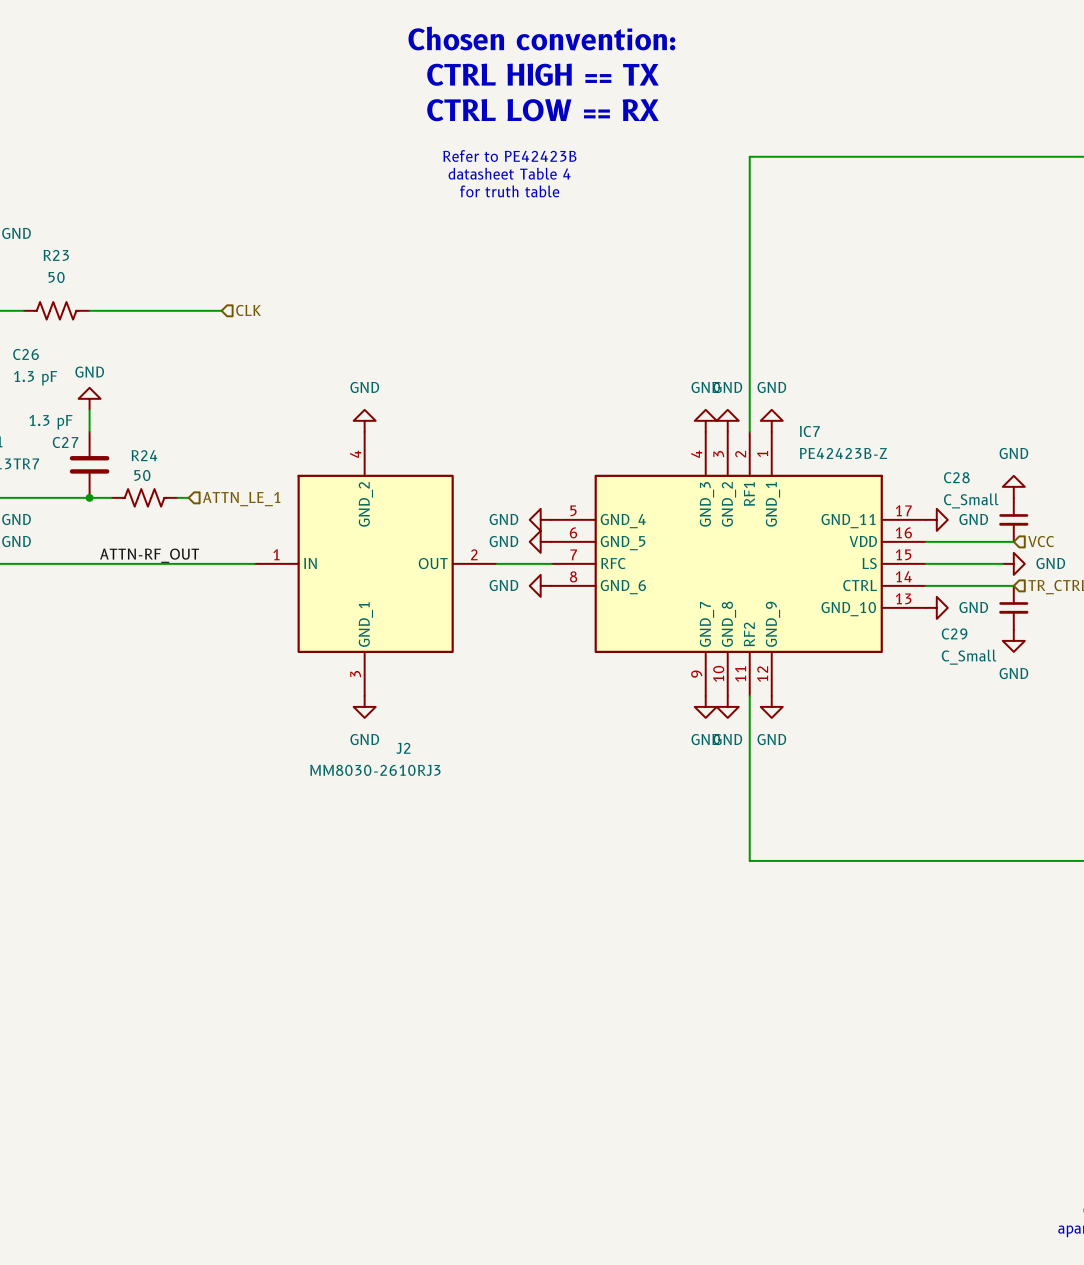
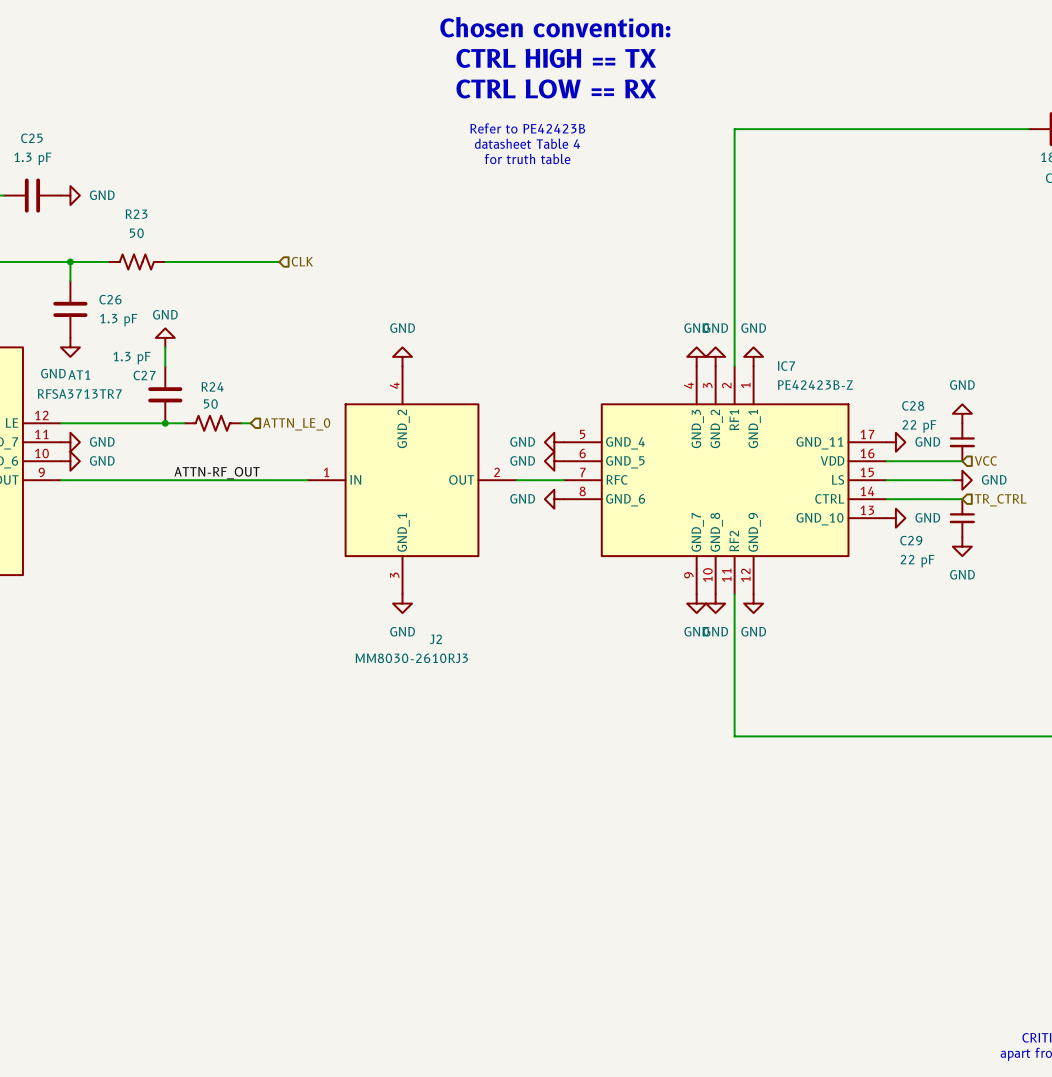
hierarchical label: ATTN_LE_1 (241, 499) -> ATTN_LE_0 (296, 424)
C28 value: C_Small (971, 500) -> 22 pF (919, 426)
C29 value: C_Small (969, 657) -> 22 pF (917, 561)

